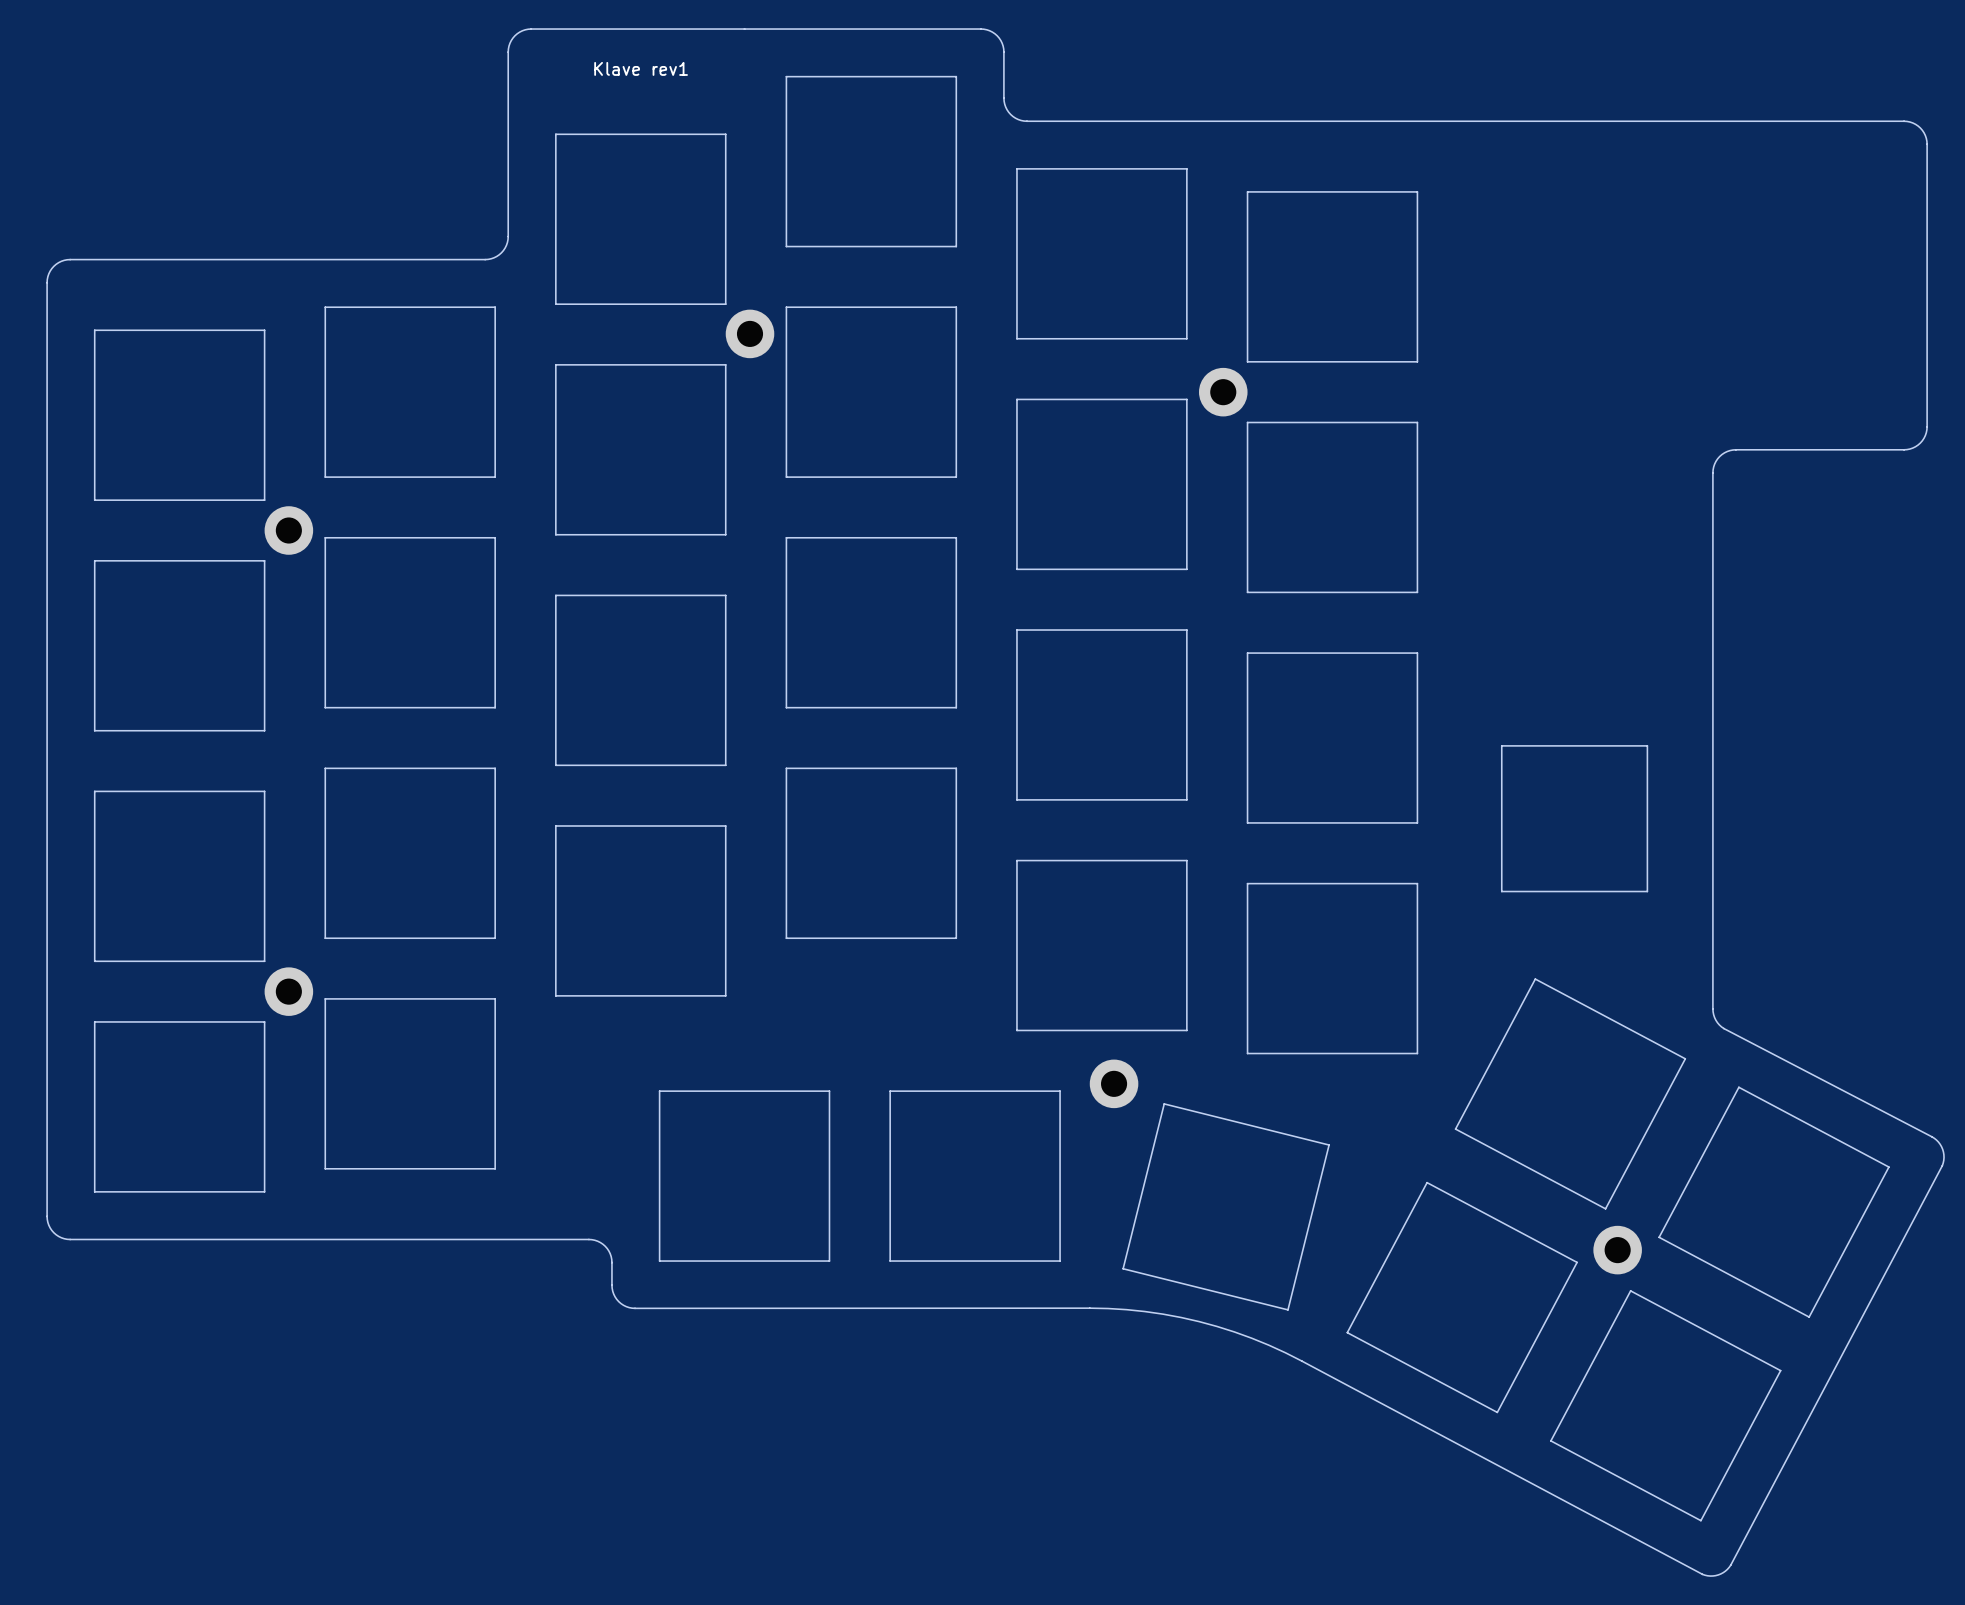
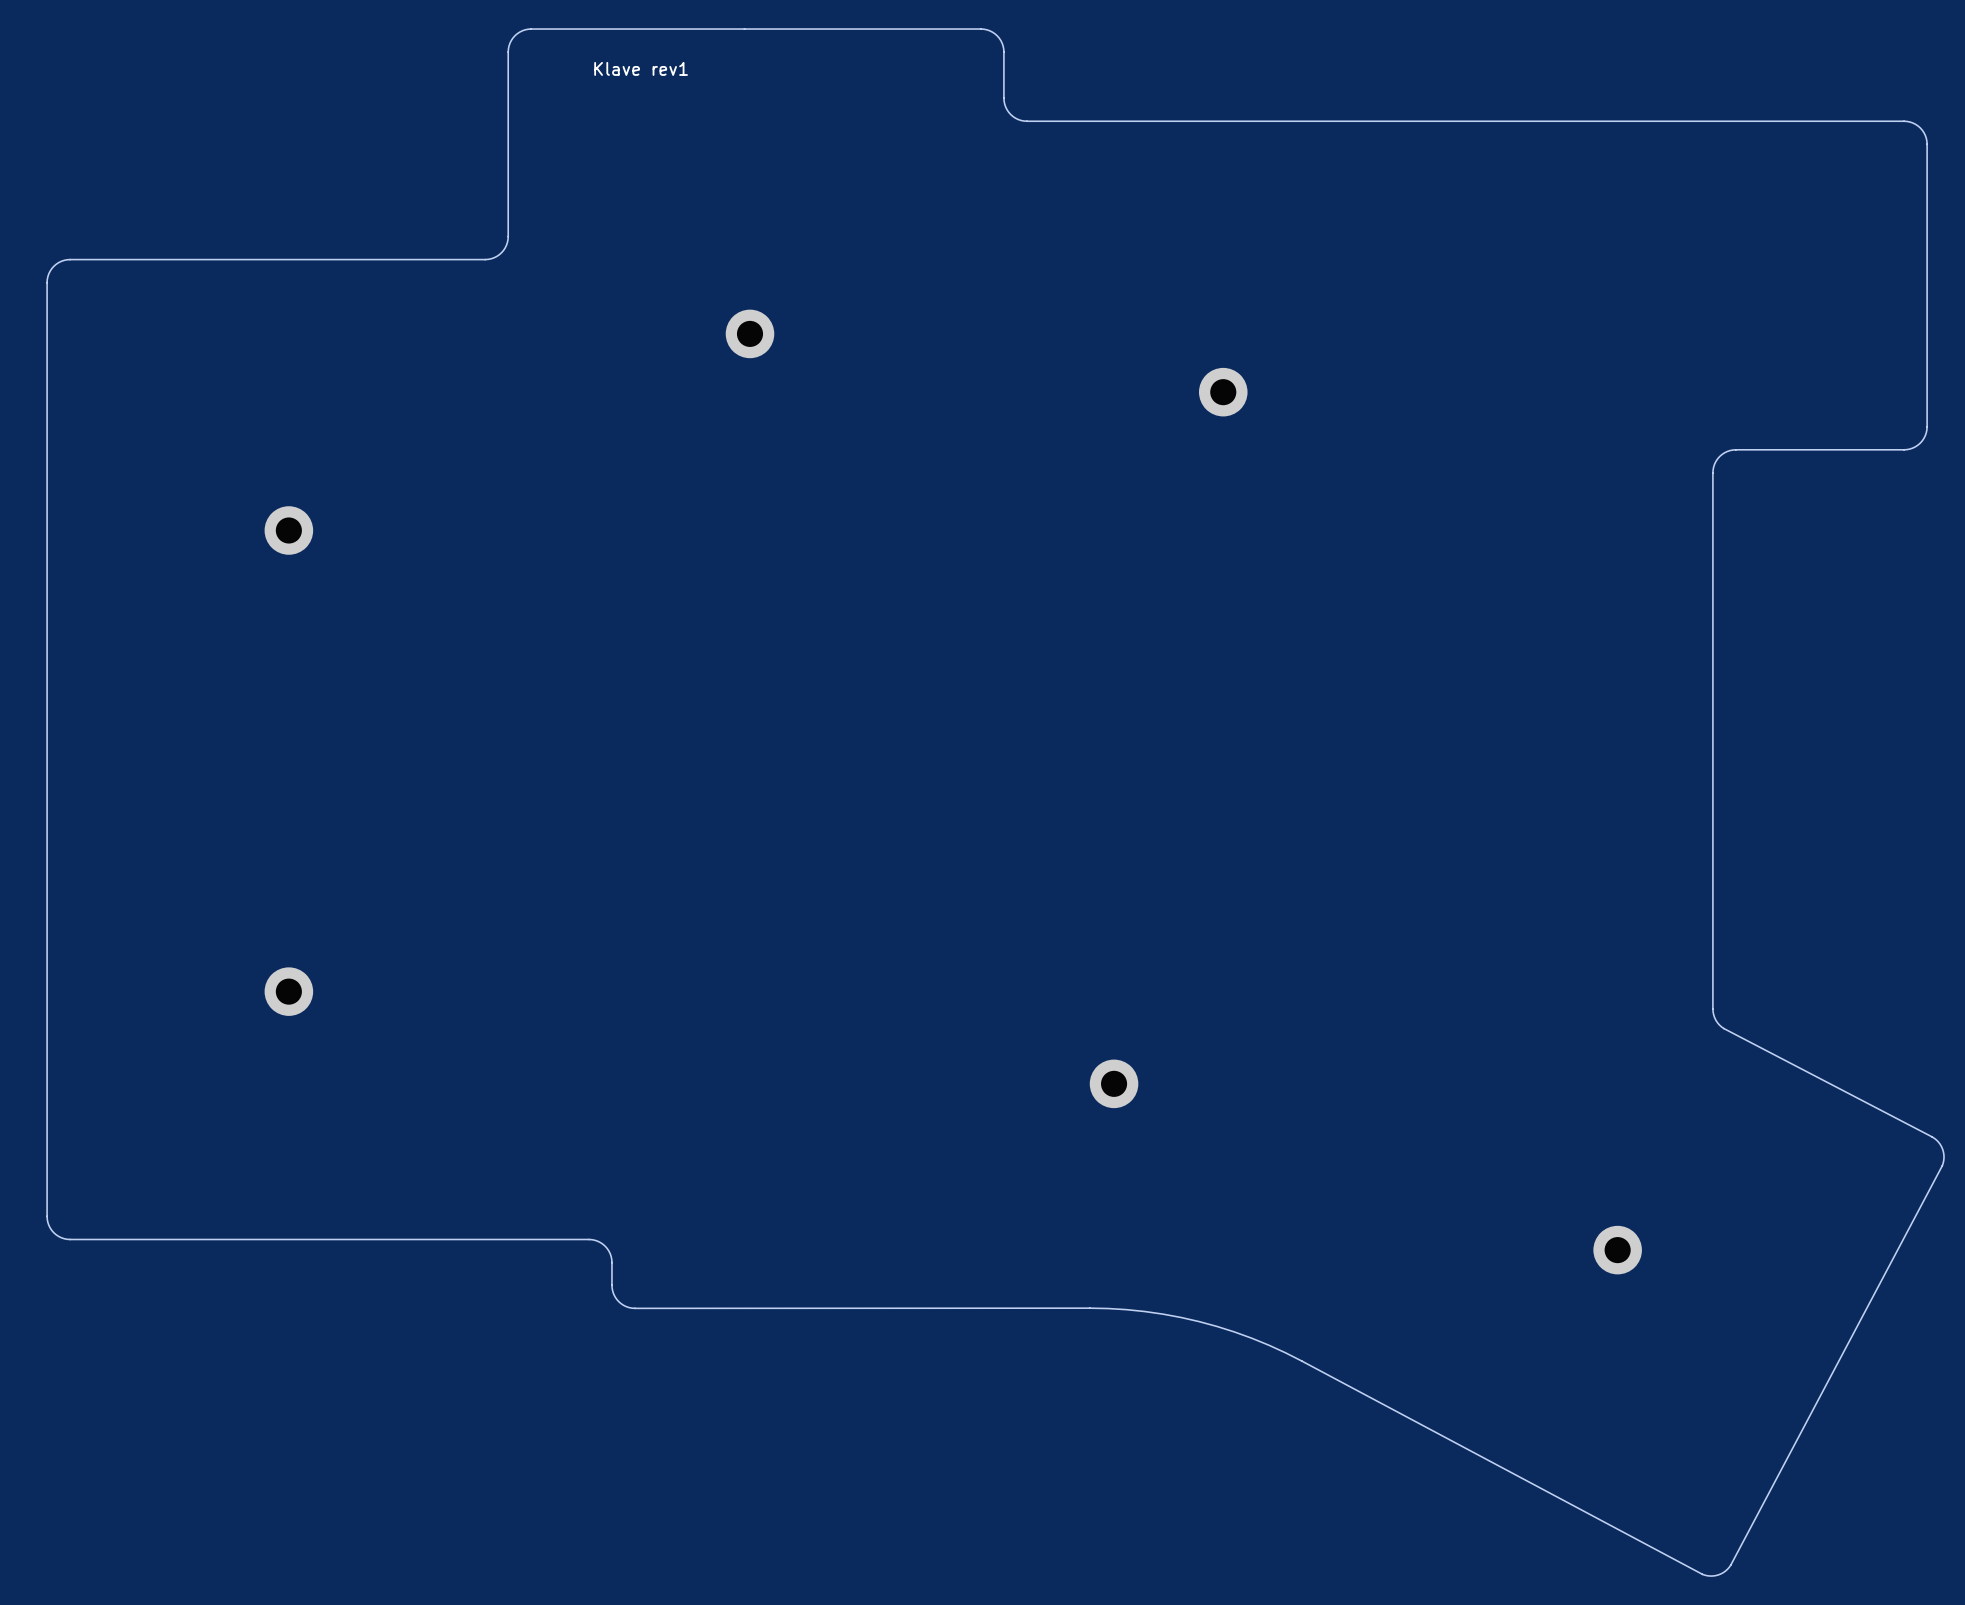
board edge: (786, 76) (786, 246) (956, 246) (956, 76) (786, 76) -> none
board edge: (555, 134) (555, 304) (725, 304) (725, 134) (555, 134) -> none
board edge: (1016, 168) (1016, 338) (1186, 338) (1186, 168) (1016, 168) -> none
board edge: (1247, 191) (1247, 361) (1417, 361) (1417, 191) (1247, 191) -> none
board edge: (325, 307) (325, 477) (495, 477) (495, 307) (325, 307) -> none
board edge: (786, 307) (956, 307) (956, 477) (786, 477) (786, 307) -> none
board edge: (94, 330) (94, 500) (264, 500) (264, 330) (94, 330) -> none
board edge: (555, 364) (555, 534) (725, 534) (725, 364) (555, 364) -> none
board edge: (1016, 399) (1016, 569) (1186, 569) (1186, 399) (1016, 399) -> none
board edge: (1247, 422) (1247, 592) (1417, 592) (1417, 422) (1247, 422) -> none
board edge: (325, 537) (325, 707) (495, 707) (495, 537) (325, 537) -> none
board edge: (786, 537) (956, 537) (956, 707) (786, 707) (786, 537) -> none
board edge: (94, 560) (94, 730) (264, 730) (264, 560) (94, 560) -> none
board edge: (555, 595) (555, 765) (725, 765) (725, 595) (555, 595) -> none
board edge: (1016, 630) (1016, 799) (1186, 799) (1186, 630) (1016, 630) -> none
board edge: (1247, 653) (1247, 822) (1417, 822) (1417, 653) (1247, 653) -> none
board edge: (1501, 745) (1501, 891) (1647, 891) (1647, 745) (1501, 745) -> none
board edge: (325, 768) (325, 938) (495, 938) (495, 768) (325, 768) -> none
board edge: (786, 768) (956, 768) (956, 938) (786, 938) (786, 768) -> none
board edge: (94, 791) (94, 961) (264, 961) (264, 791) (94, 791) -> none
board edge: (555, 825) (555, 995) (725, 995) (725, 825) (555, 825) -> none
board edge: (1016, 860) (1016, 1030) (1186, 1030) (1186, 860) (1016, 860) -> none
board edge: (1247, 883) (1247, 1053) (1417, 1053) (1417, 883) (1247, 883) -> none
board edge: (1535, 979) (1455, 1129) (1605, 1208) (1685, 1058) (1535, 979) -> none
board edge: (325, 998) (325, 1168) (495, 1168) (495, 998) (325, 998) -> none
board edge: (94, 1021) (94, 1191) (264, 1191) (264, 1021) (94, 1021) -> none
board edge: (1738, 1087) (1888, 1167) (1809, 1317) (1659, 1237) (1738, 1087) -> none
board edge: (659, 1091) (829, 1091) (829, 1261) (659, 1261) (659, 1091) -> none
board edge: (890, 1091) (1060, 1091) (1060, 1261) (890, 1261) (890, 1091) -> none
board edge: (1164, 1103) (1123, 1268) (1287, 1309) (1329, 1145) (1164, 1103) -> none
board edge: (1427, 1182) (1347, 1332) (1497, 1412) (1577, 1262) (1427, 1182) -> none
board edge: (1630, 1290) (1550, 1440) (1700, 1520) (1780, 1370) (1630, 1290) -> none

